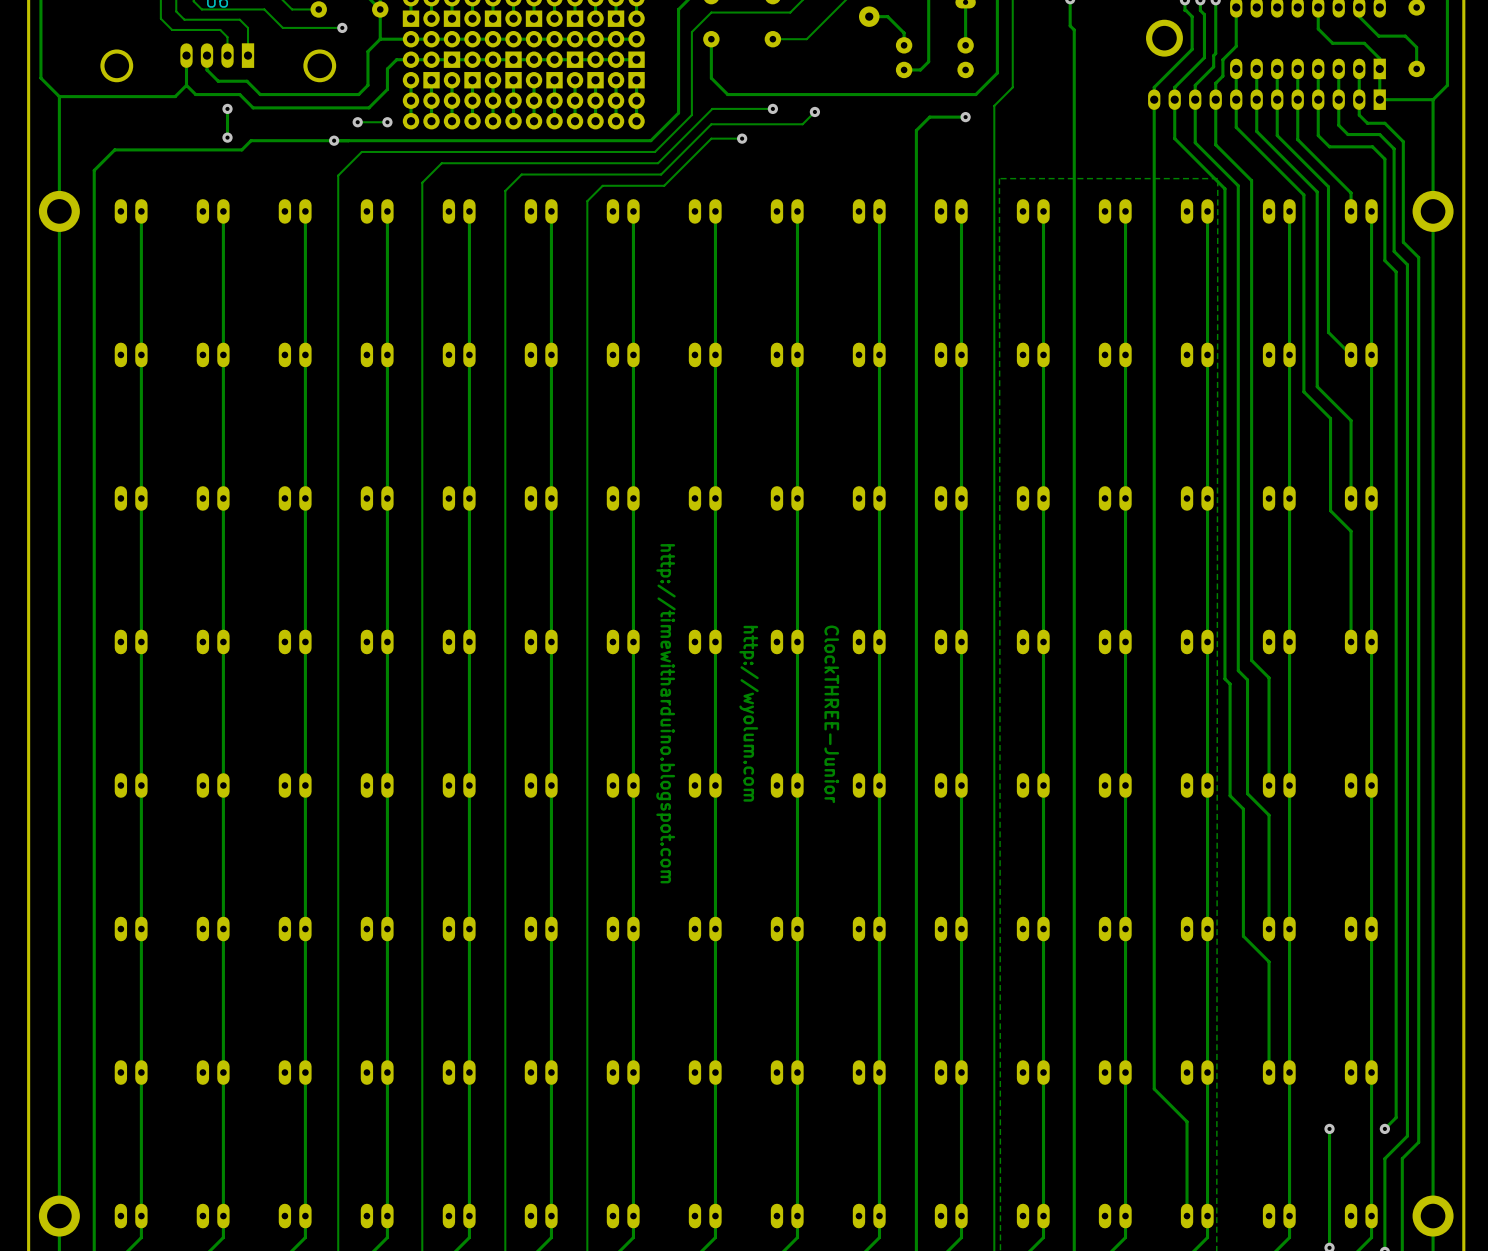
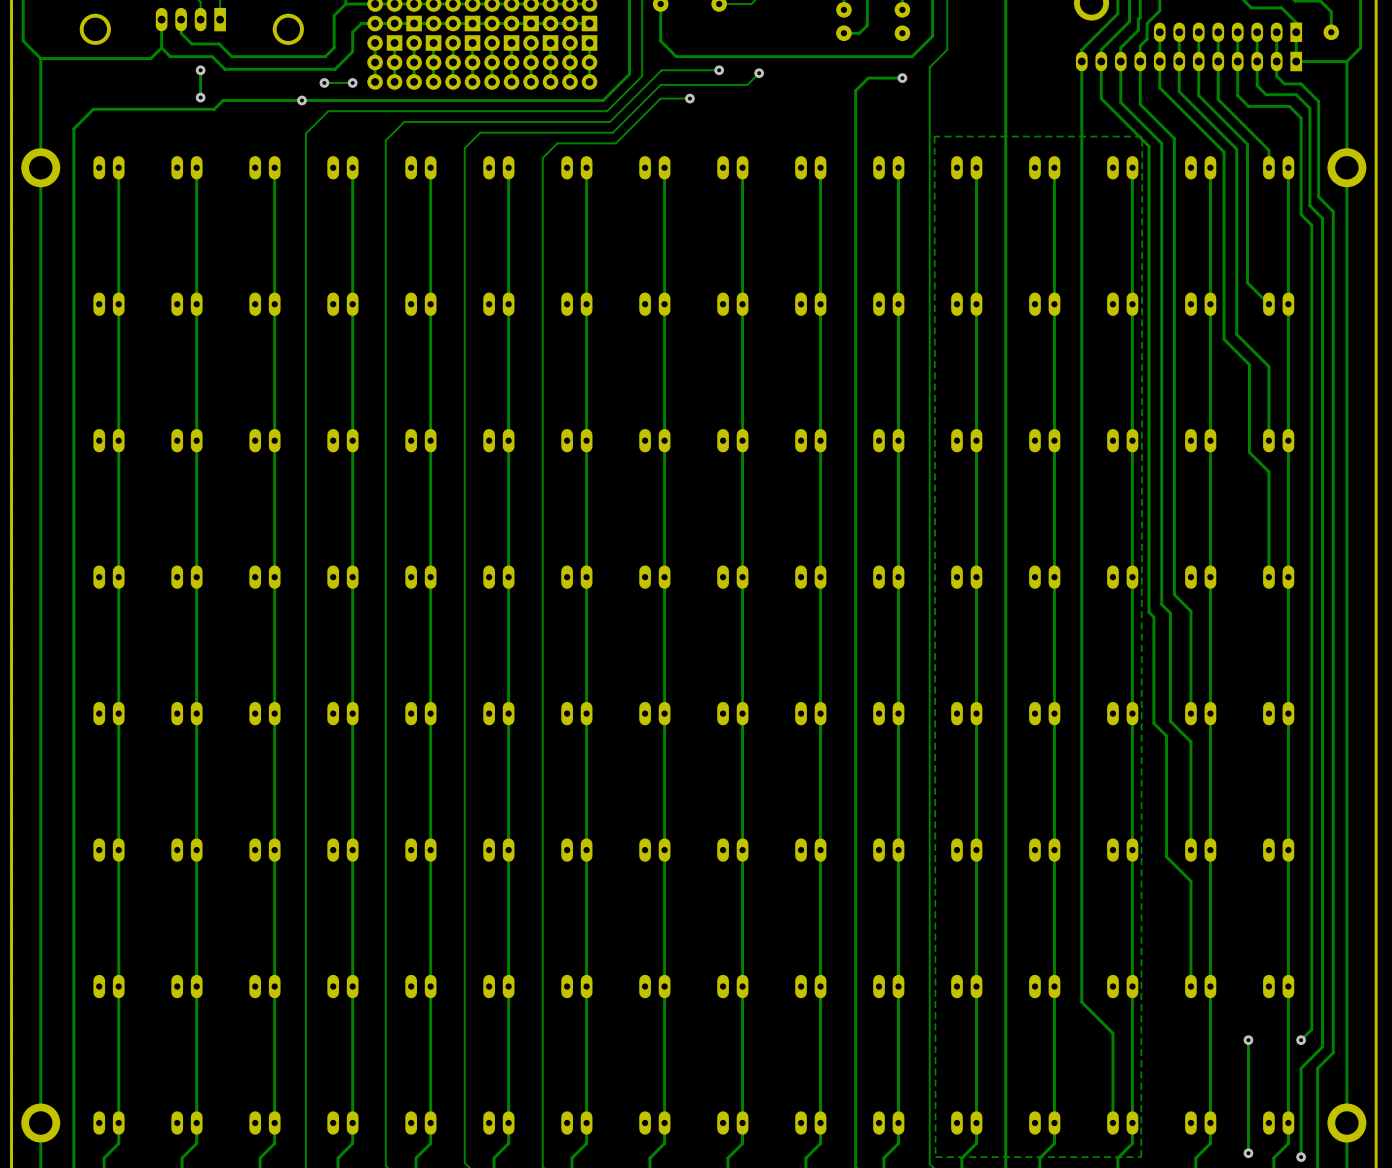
text: http://timewitharduino.blogspot.com (665, 713) -> none
text: http://wyolum.com (749, 713) -> none
text: ClockTHREE-Junior (831, 714) -> none

